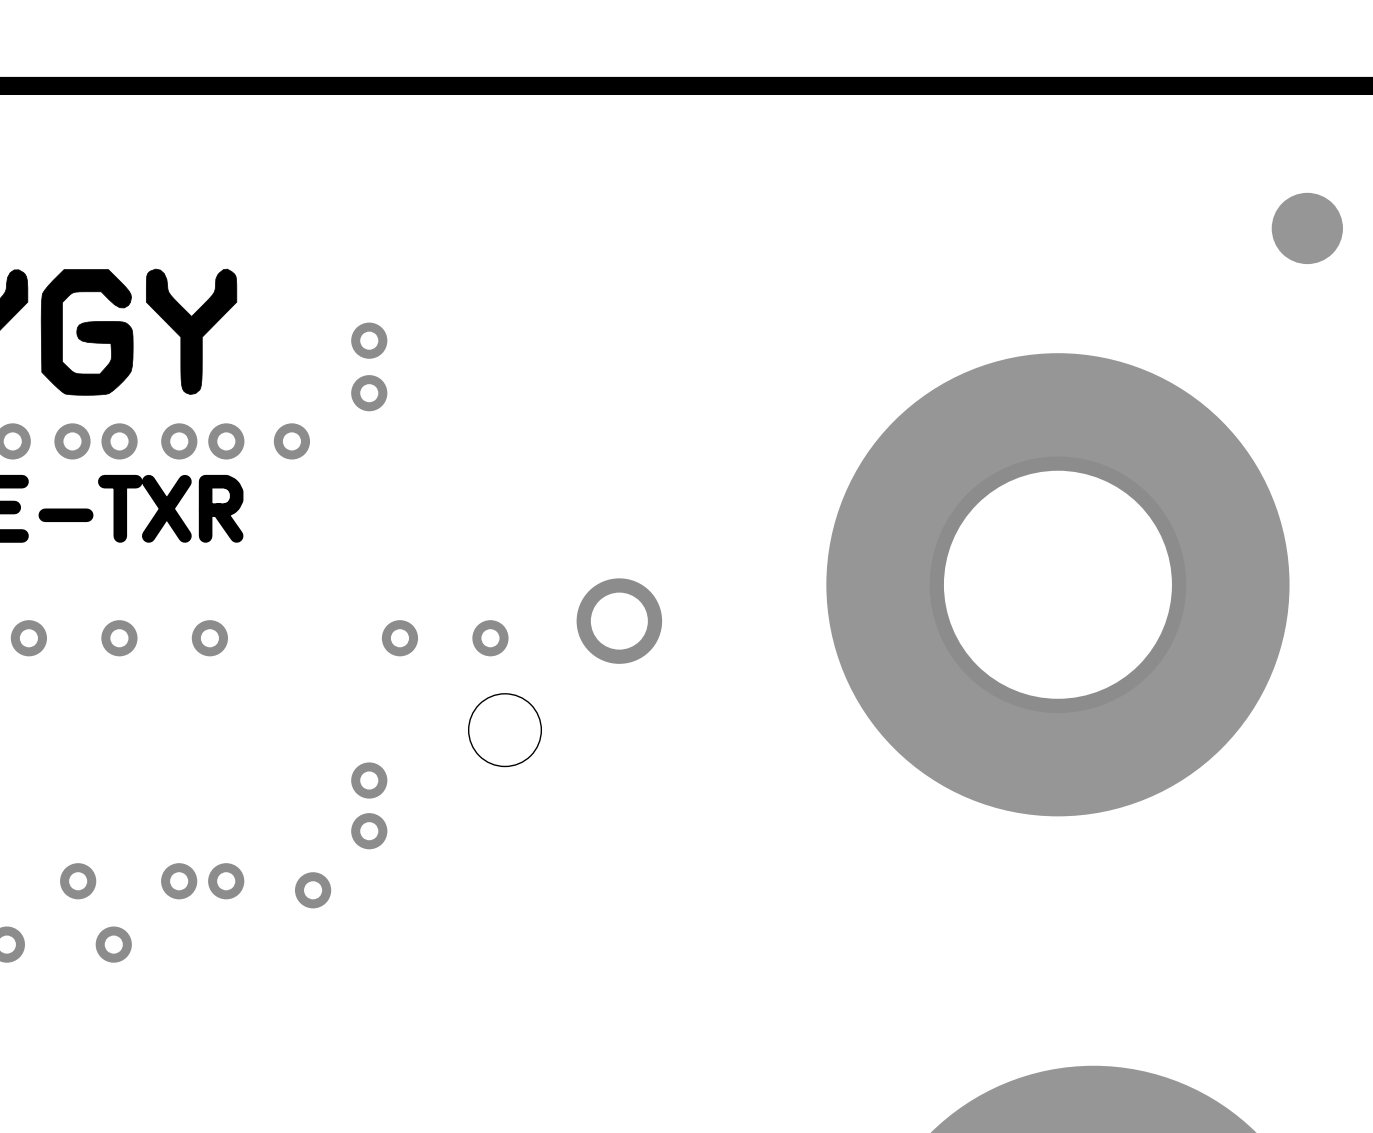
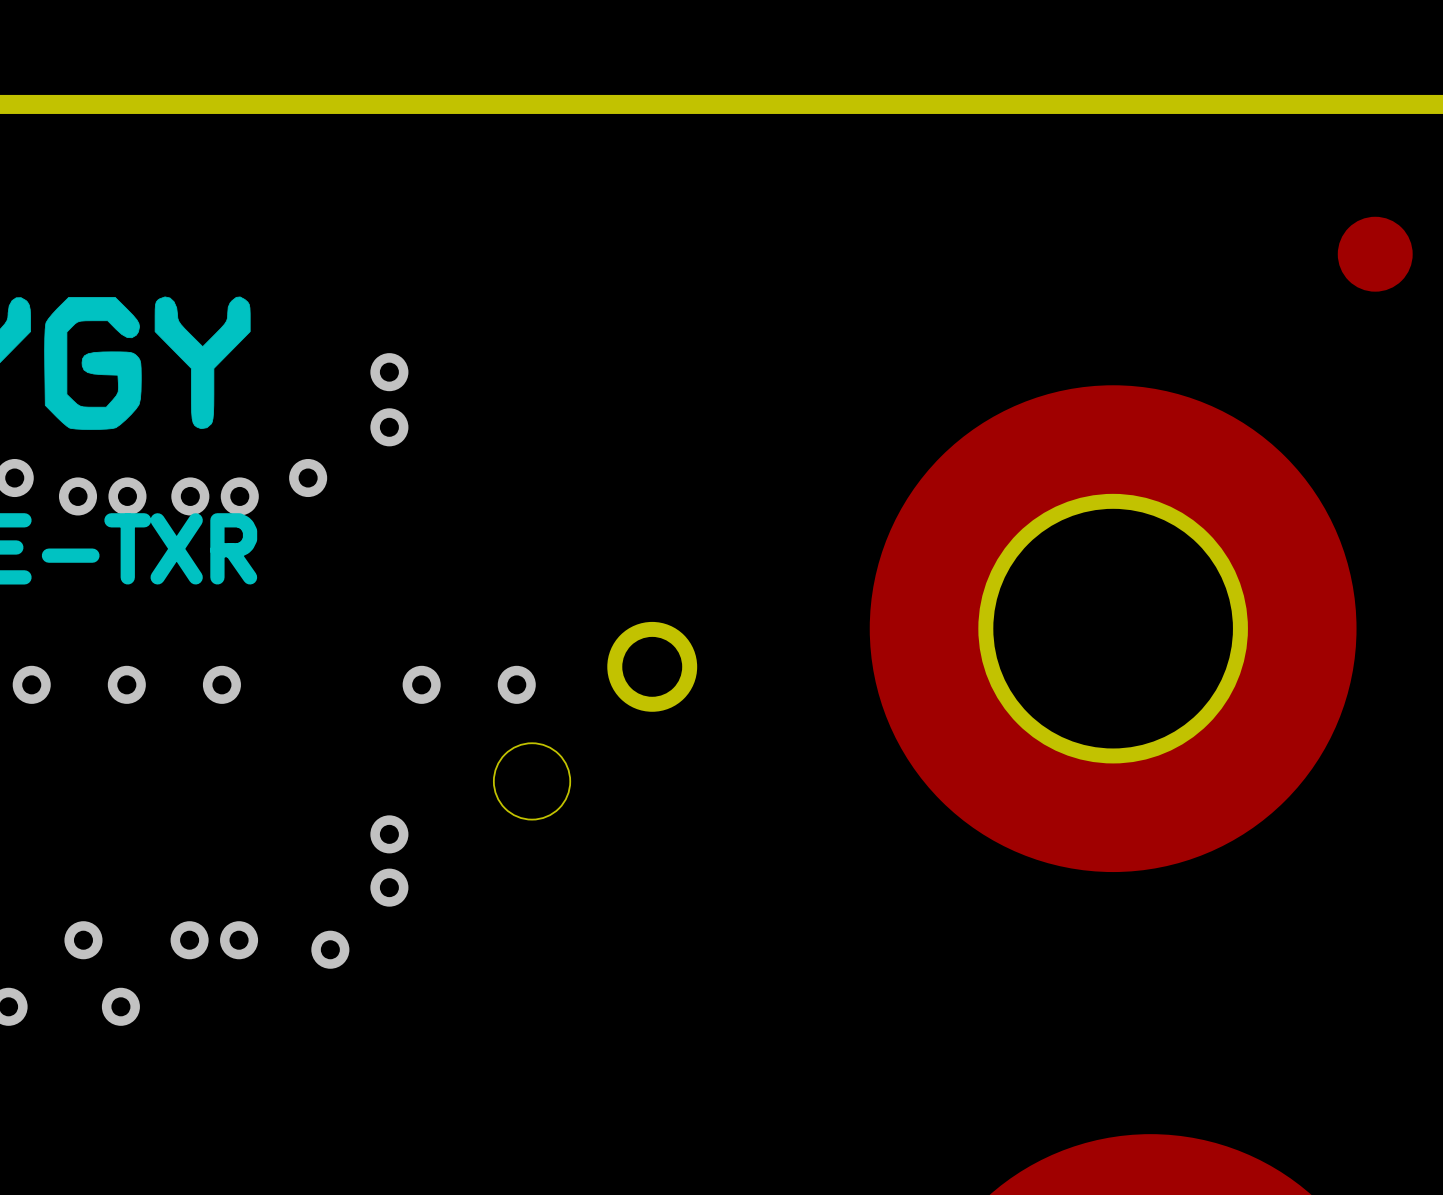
via position: (72, 441) -> (78, 496)
via position: (119, 441) -> (127, 496)
via position: (179, 441) -> (190, 496)
via position: (226, 441) -> (239, 496)

